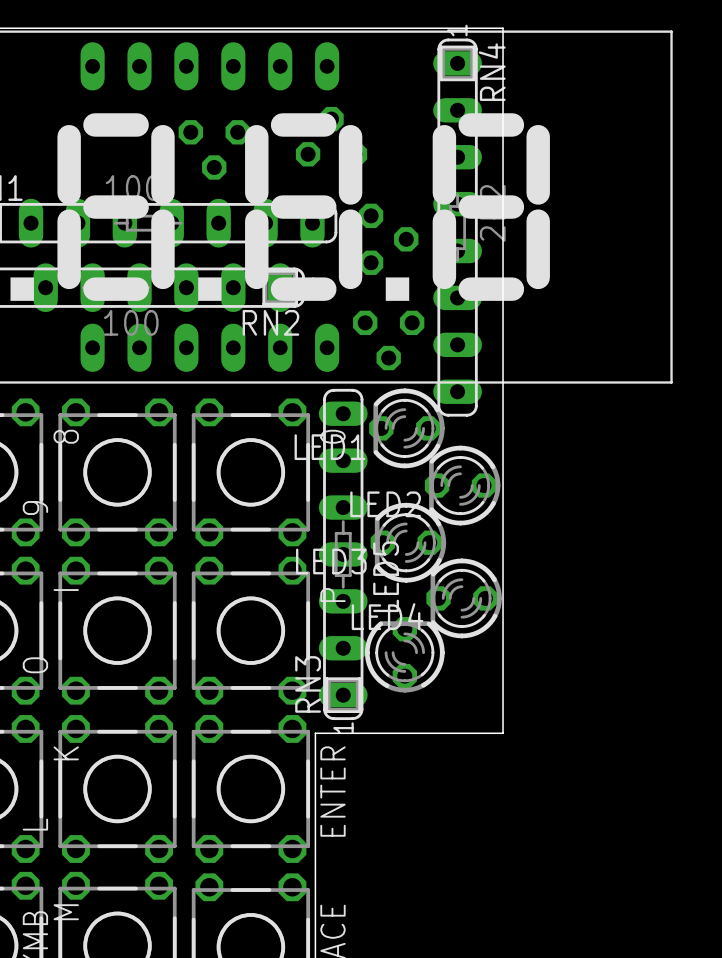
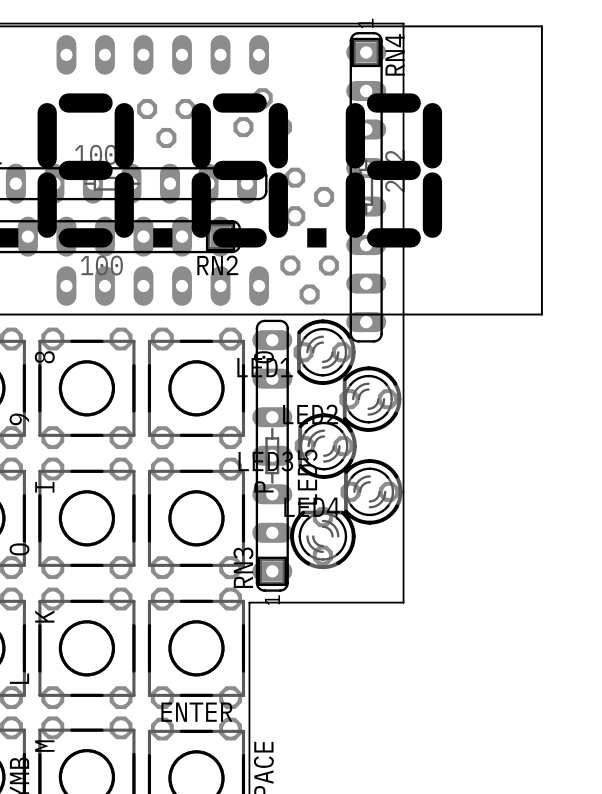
ENTER name rotation: 0° (332, 791) -> 90° clockwise (196, 712)

